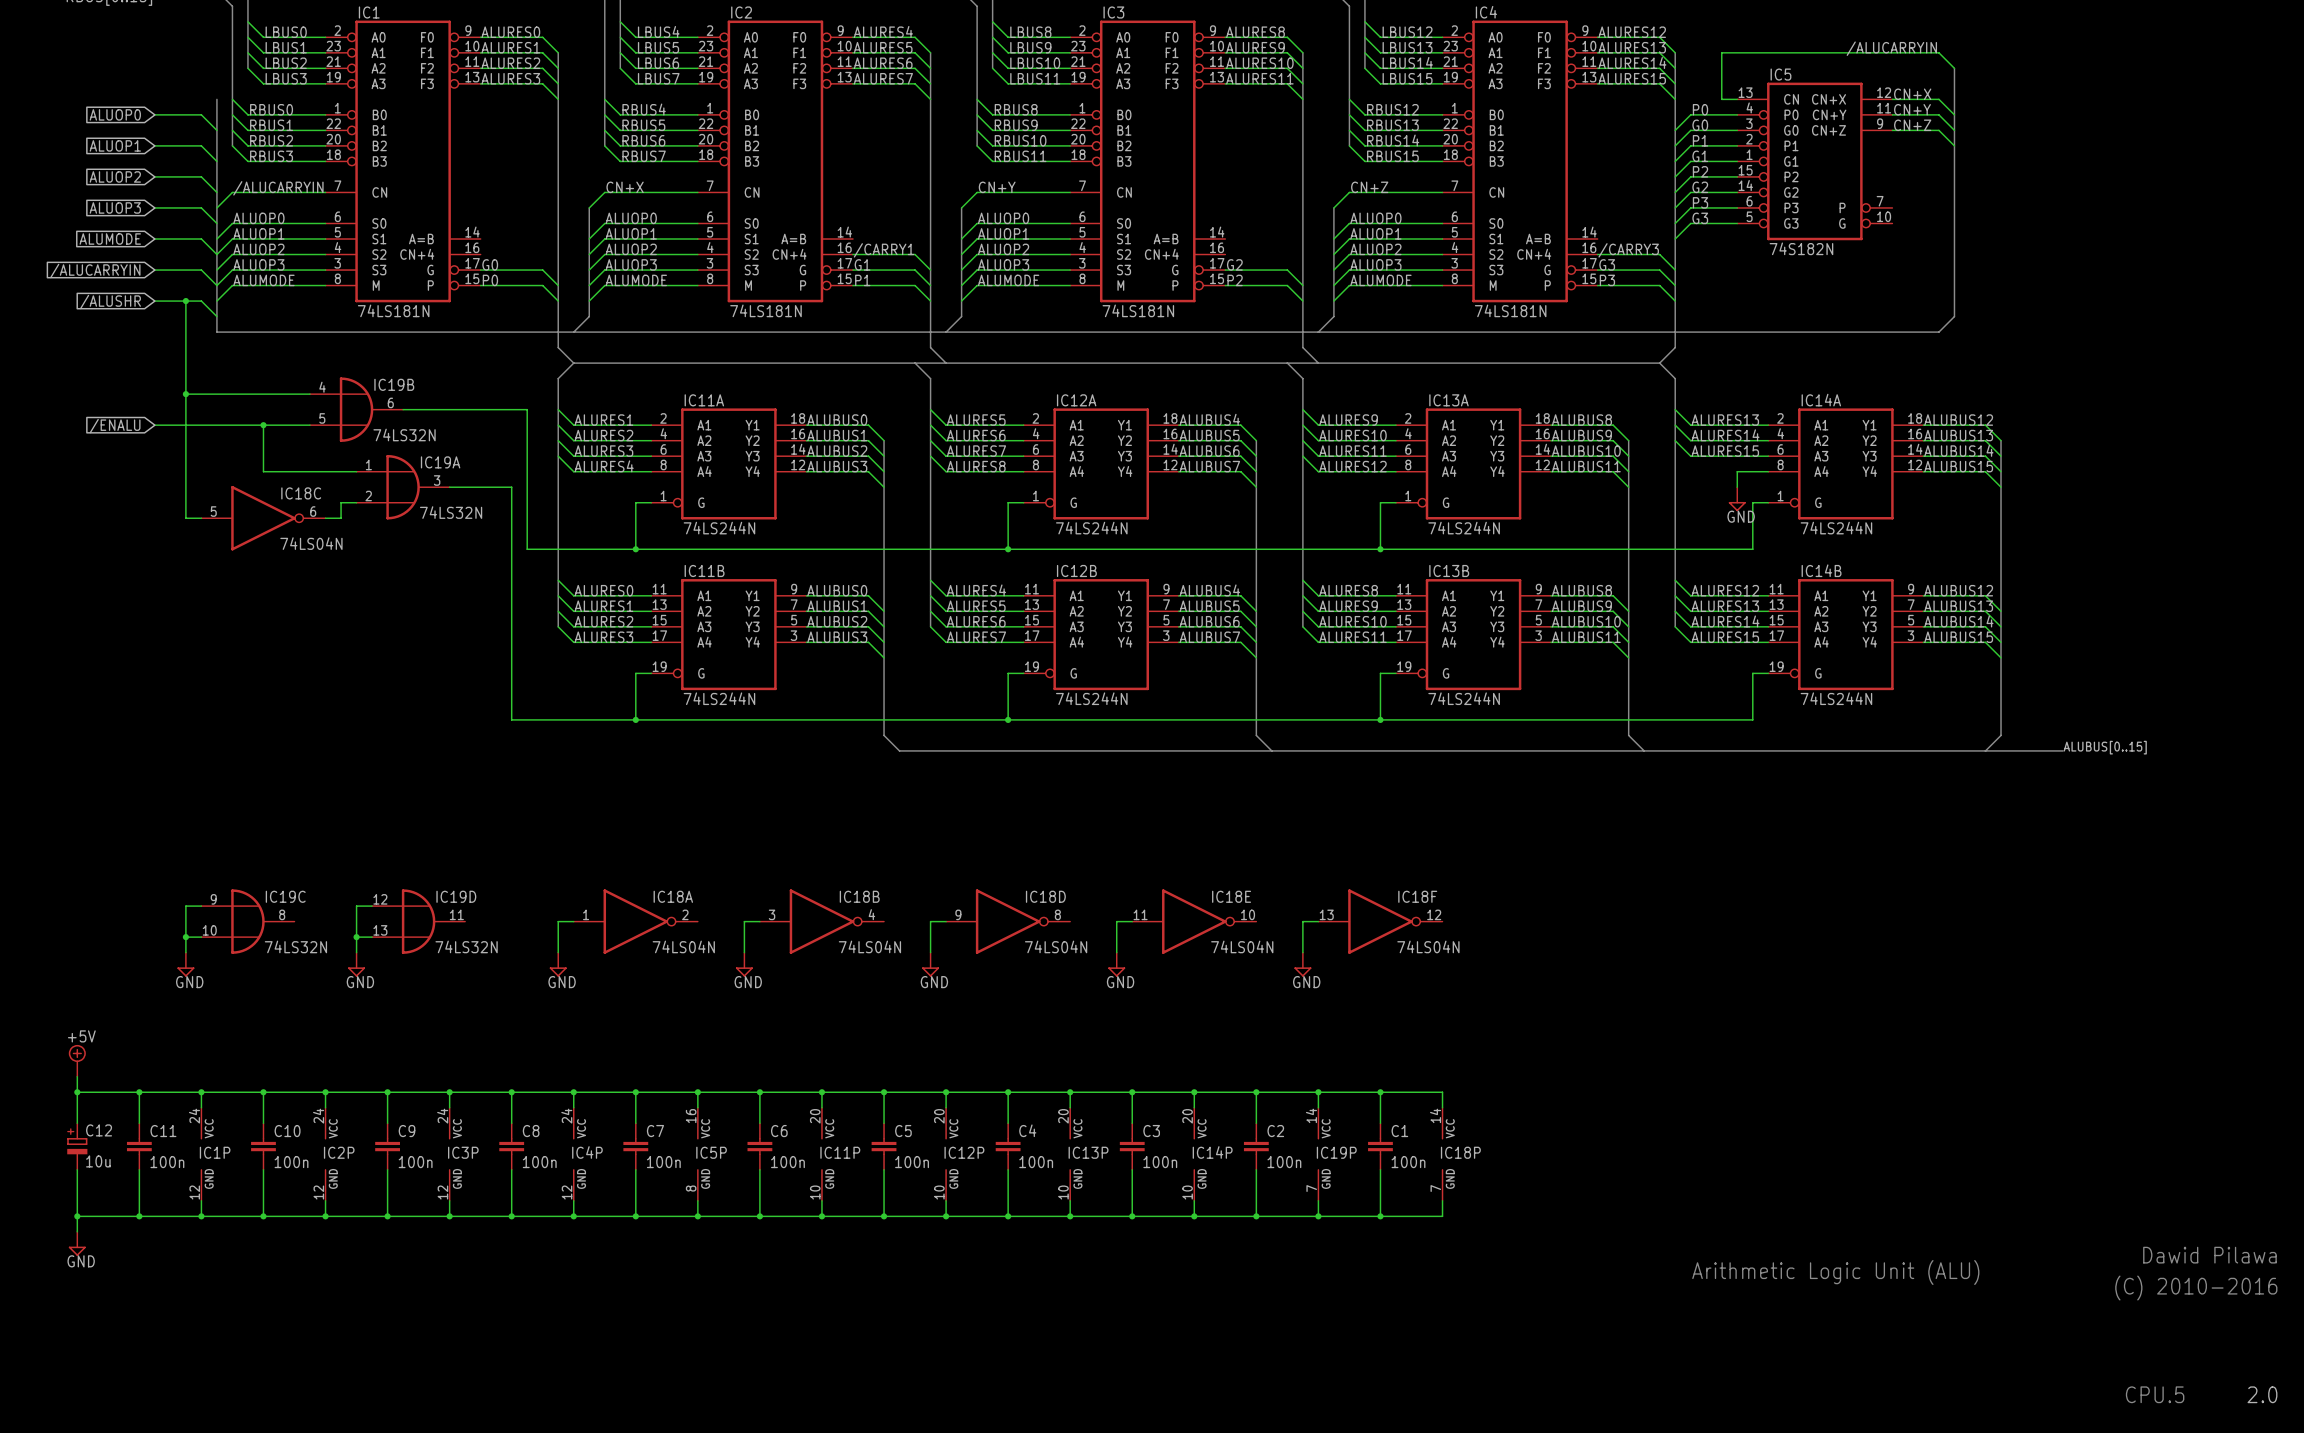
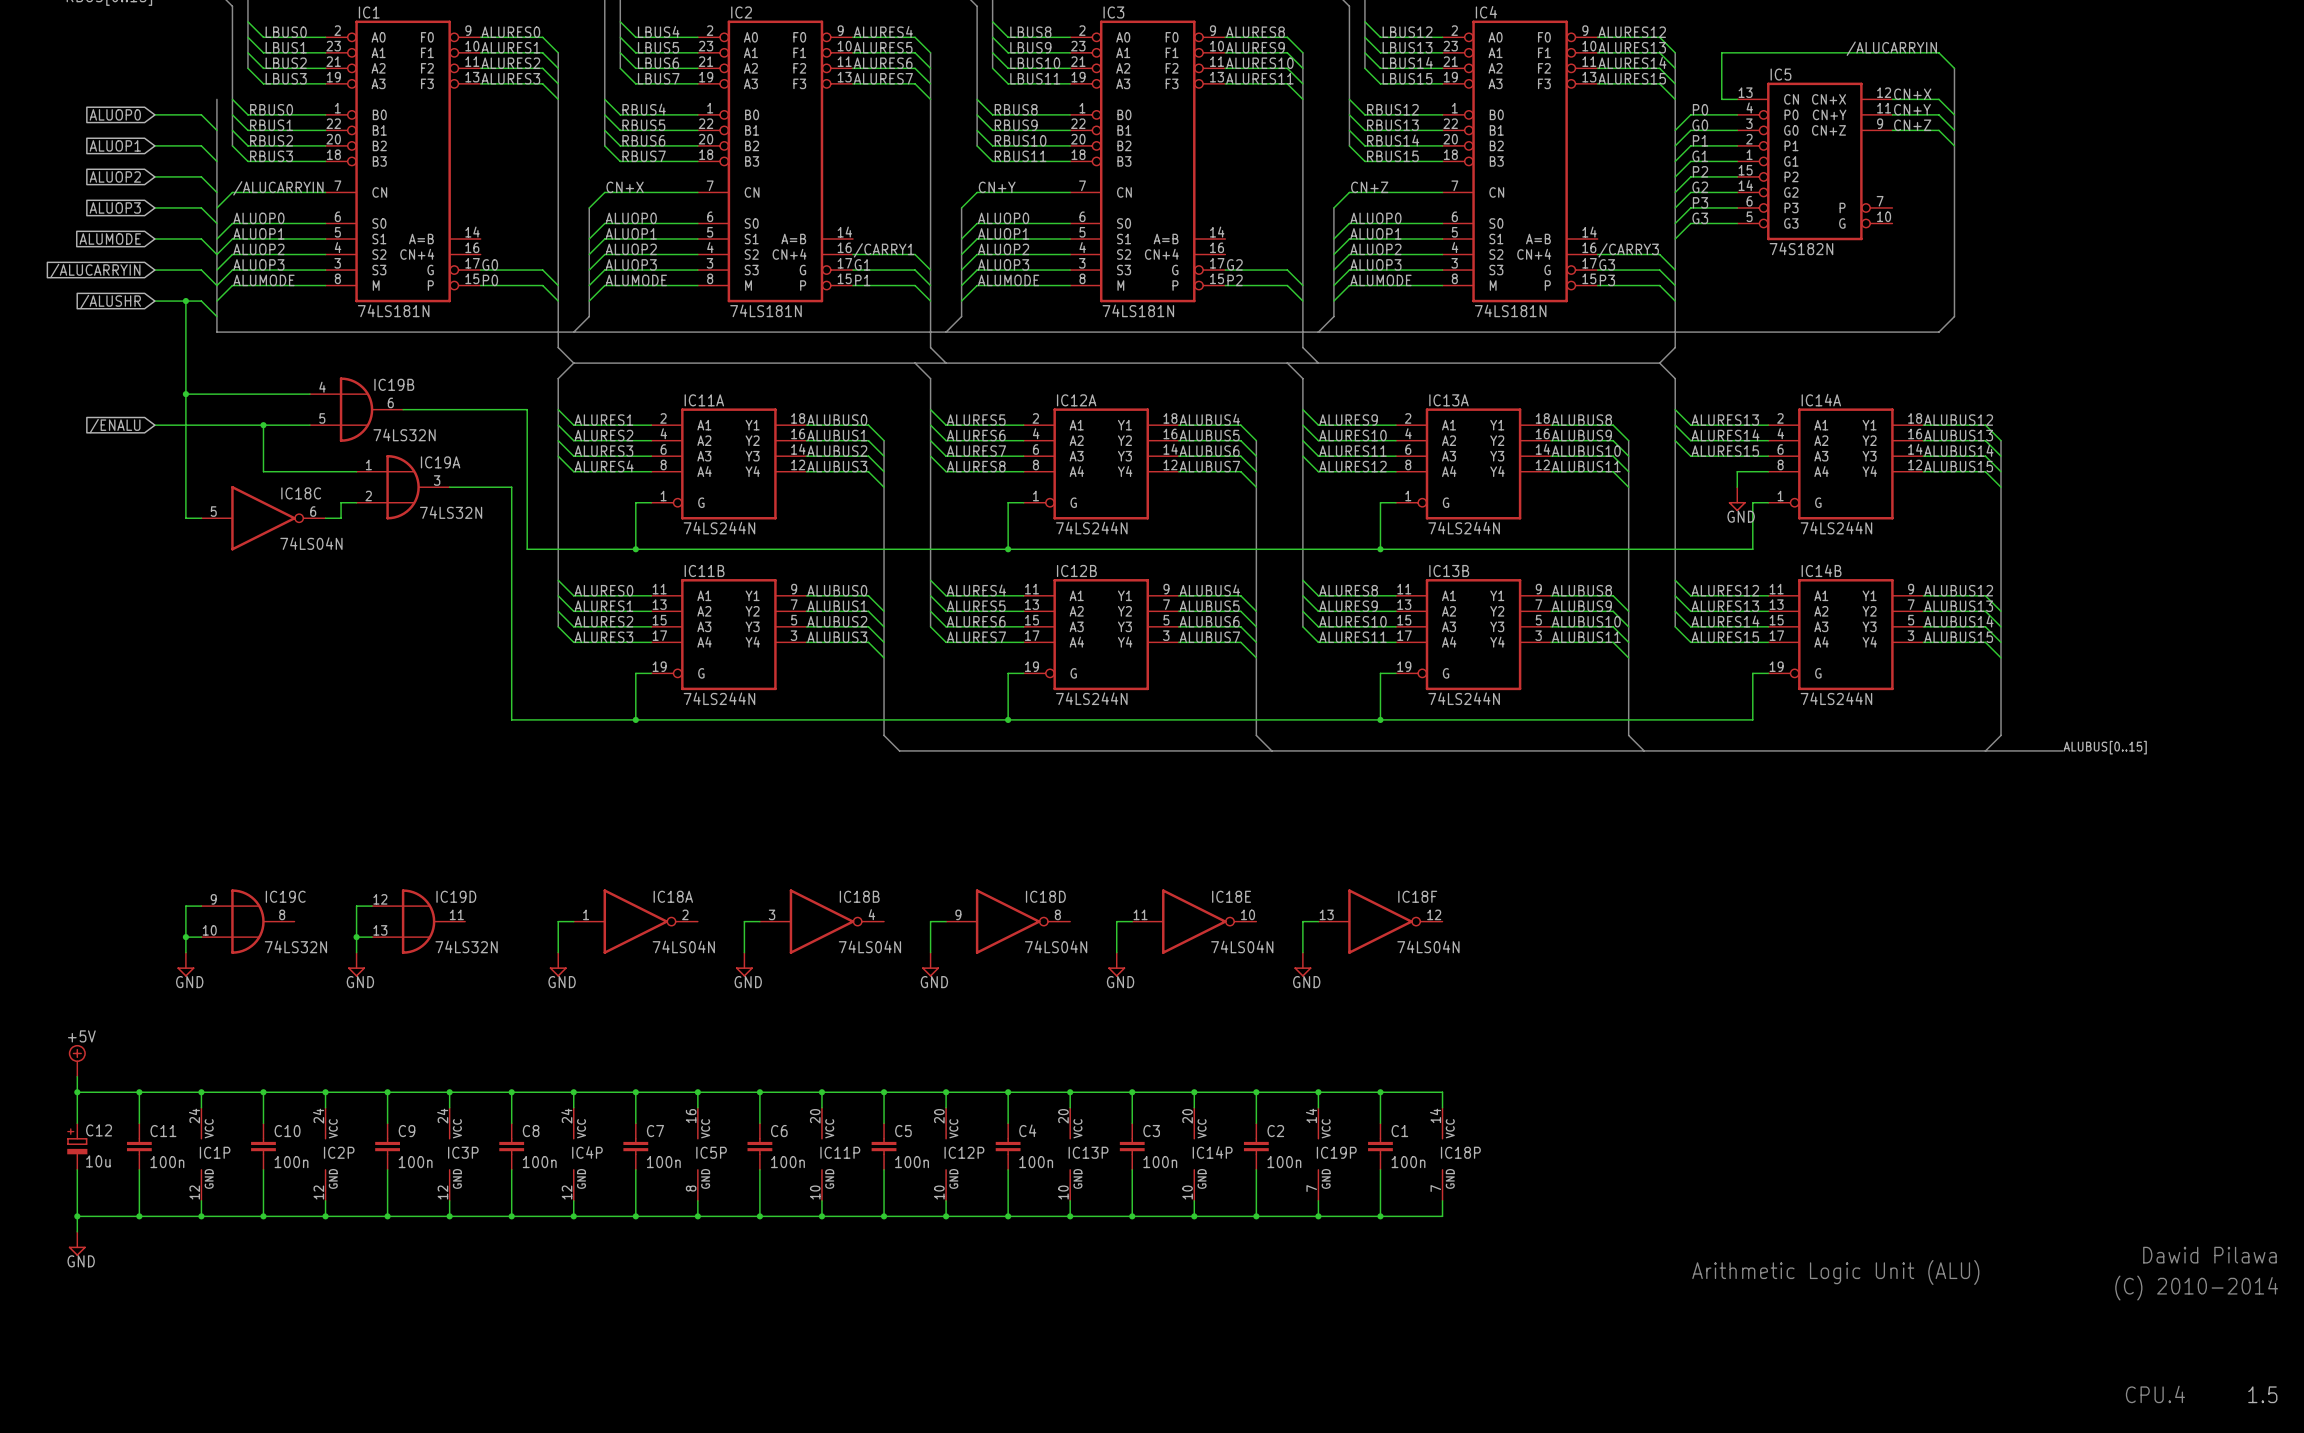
text: (C) 2010-2016 (2196, 1288) -> (C) 2010-2014 (2196, 1288)
text: CPU.5 (2155, 1394) -> CPU.4 (2155, 1394)
text: 2.0 (2262, 1394) -> 1.5 (2262, 1394)

